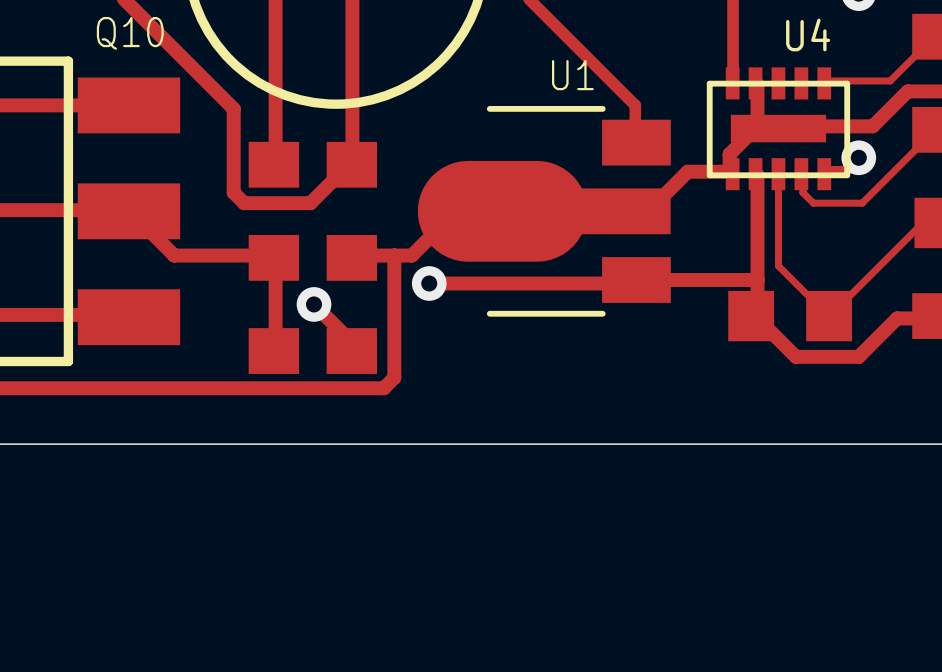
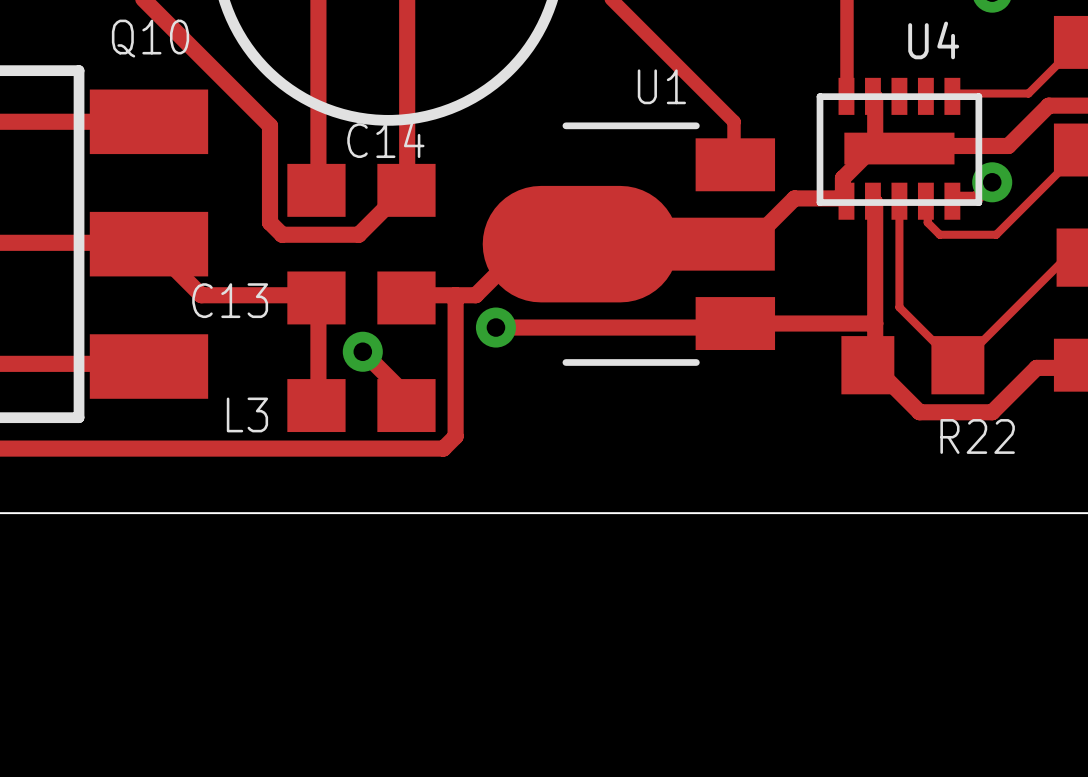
C14 name: none -> C14 (385, 139)
C13 name: none -> C13 (230, 300)
L3 name: none -> L3 (247, 414)
R22 name: none -> R22 (977, 436)

